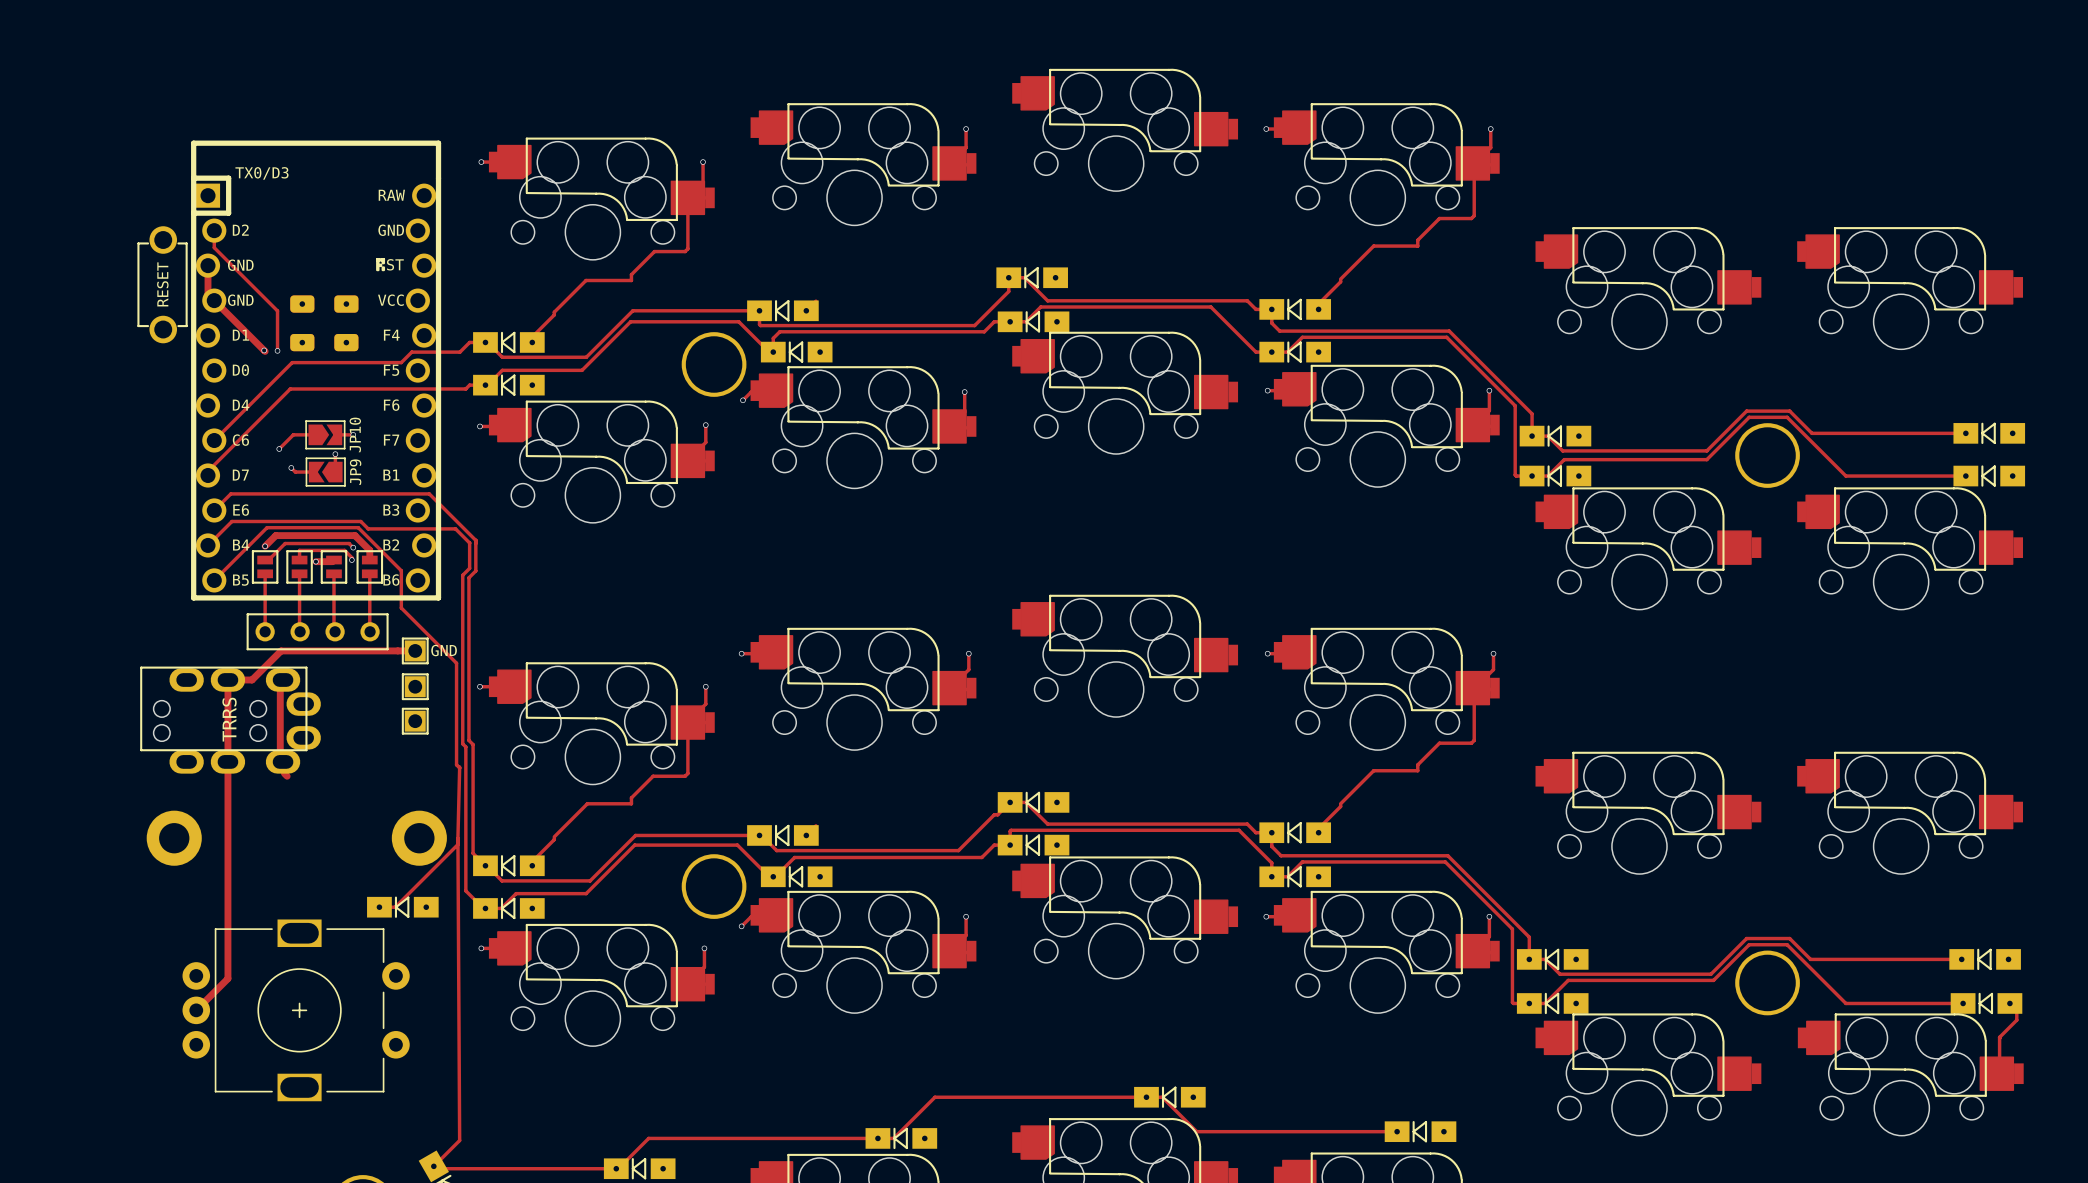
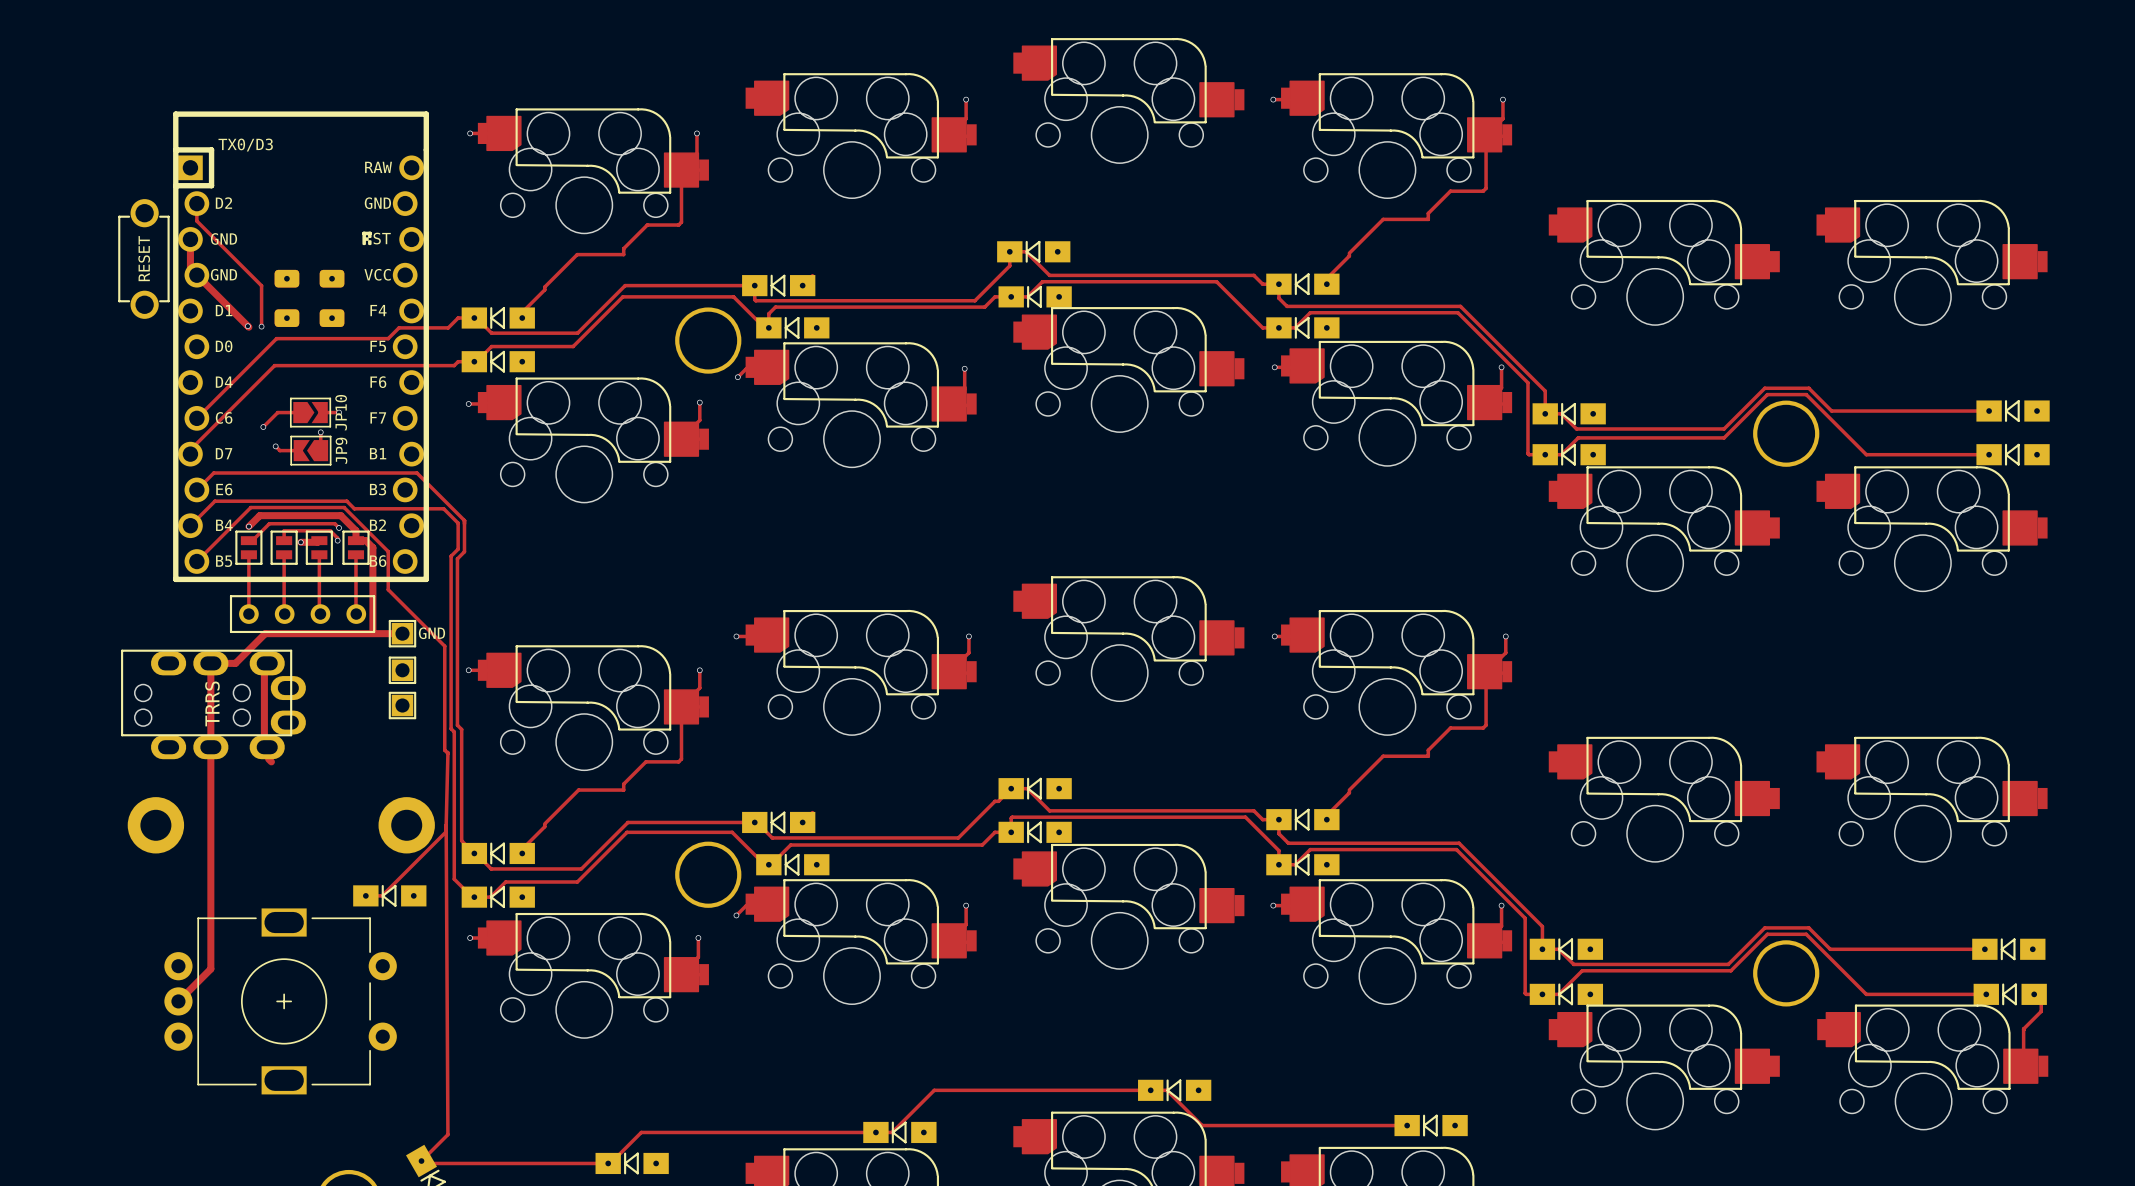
track: none -> (355, 540) (365, 540) (372, 547) (372, 632)

